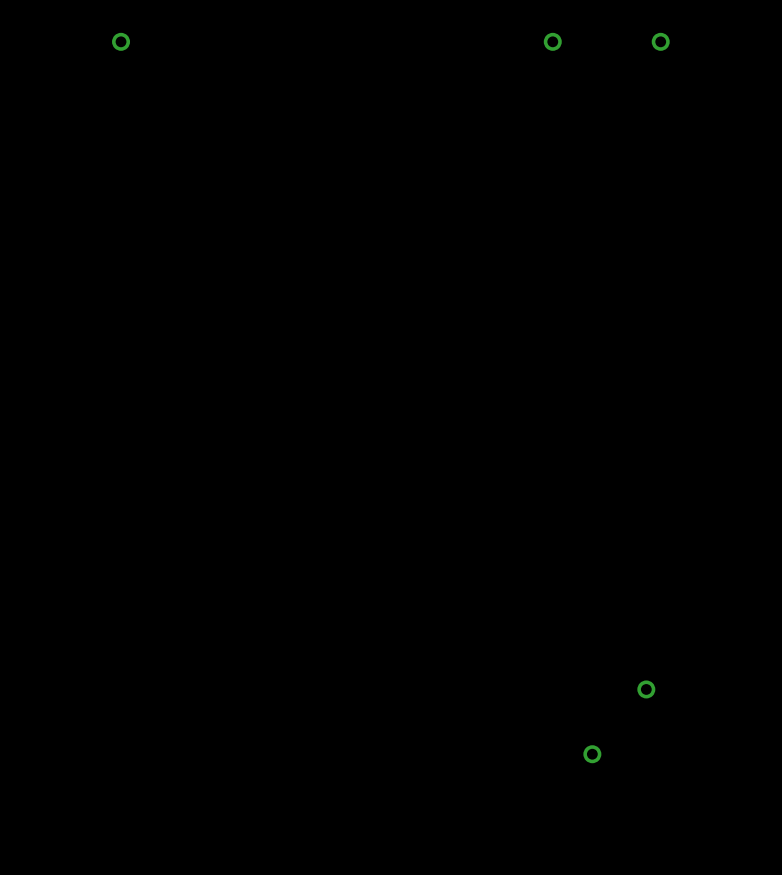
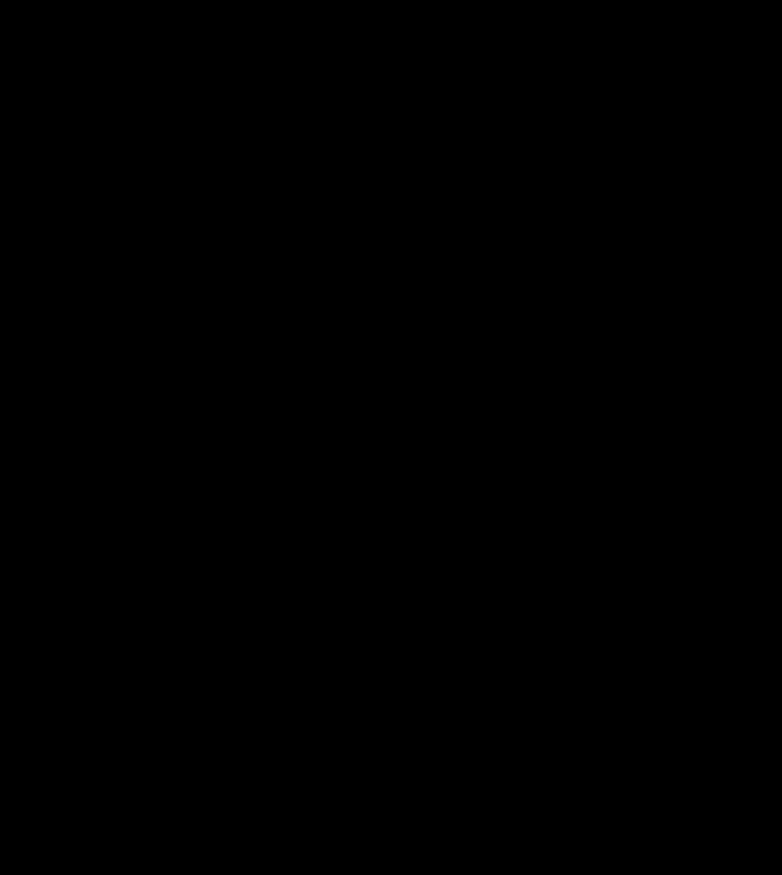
part: (121, 41) -> none
part: (552, 41) -> none
part: (660, 41) -> none
part: (646, 689) -> none
part: (592, 754) -> none

